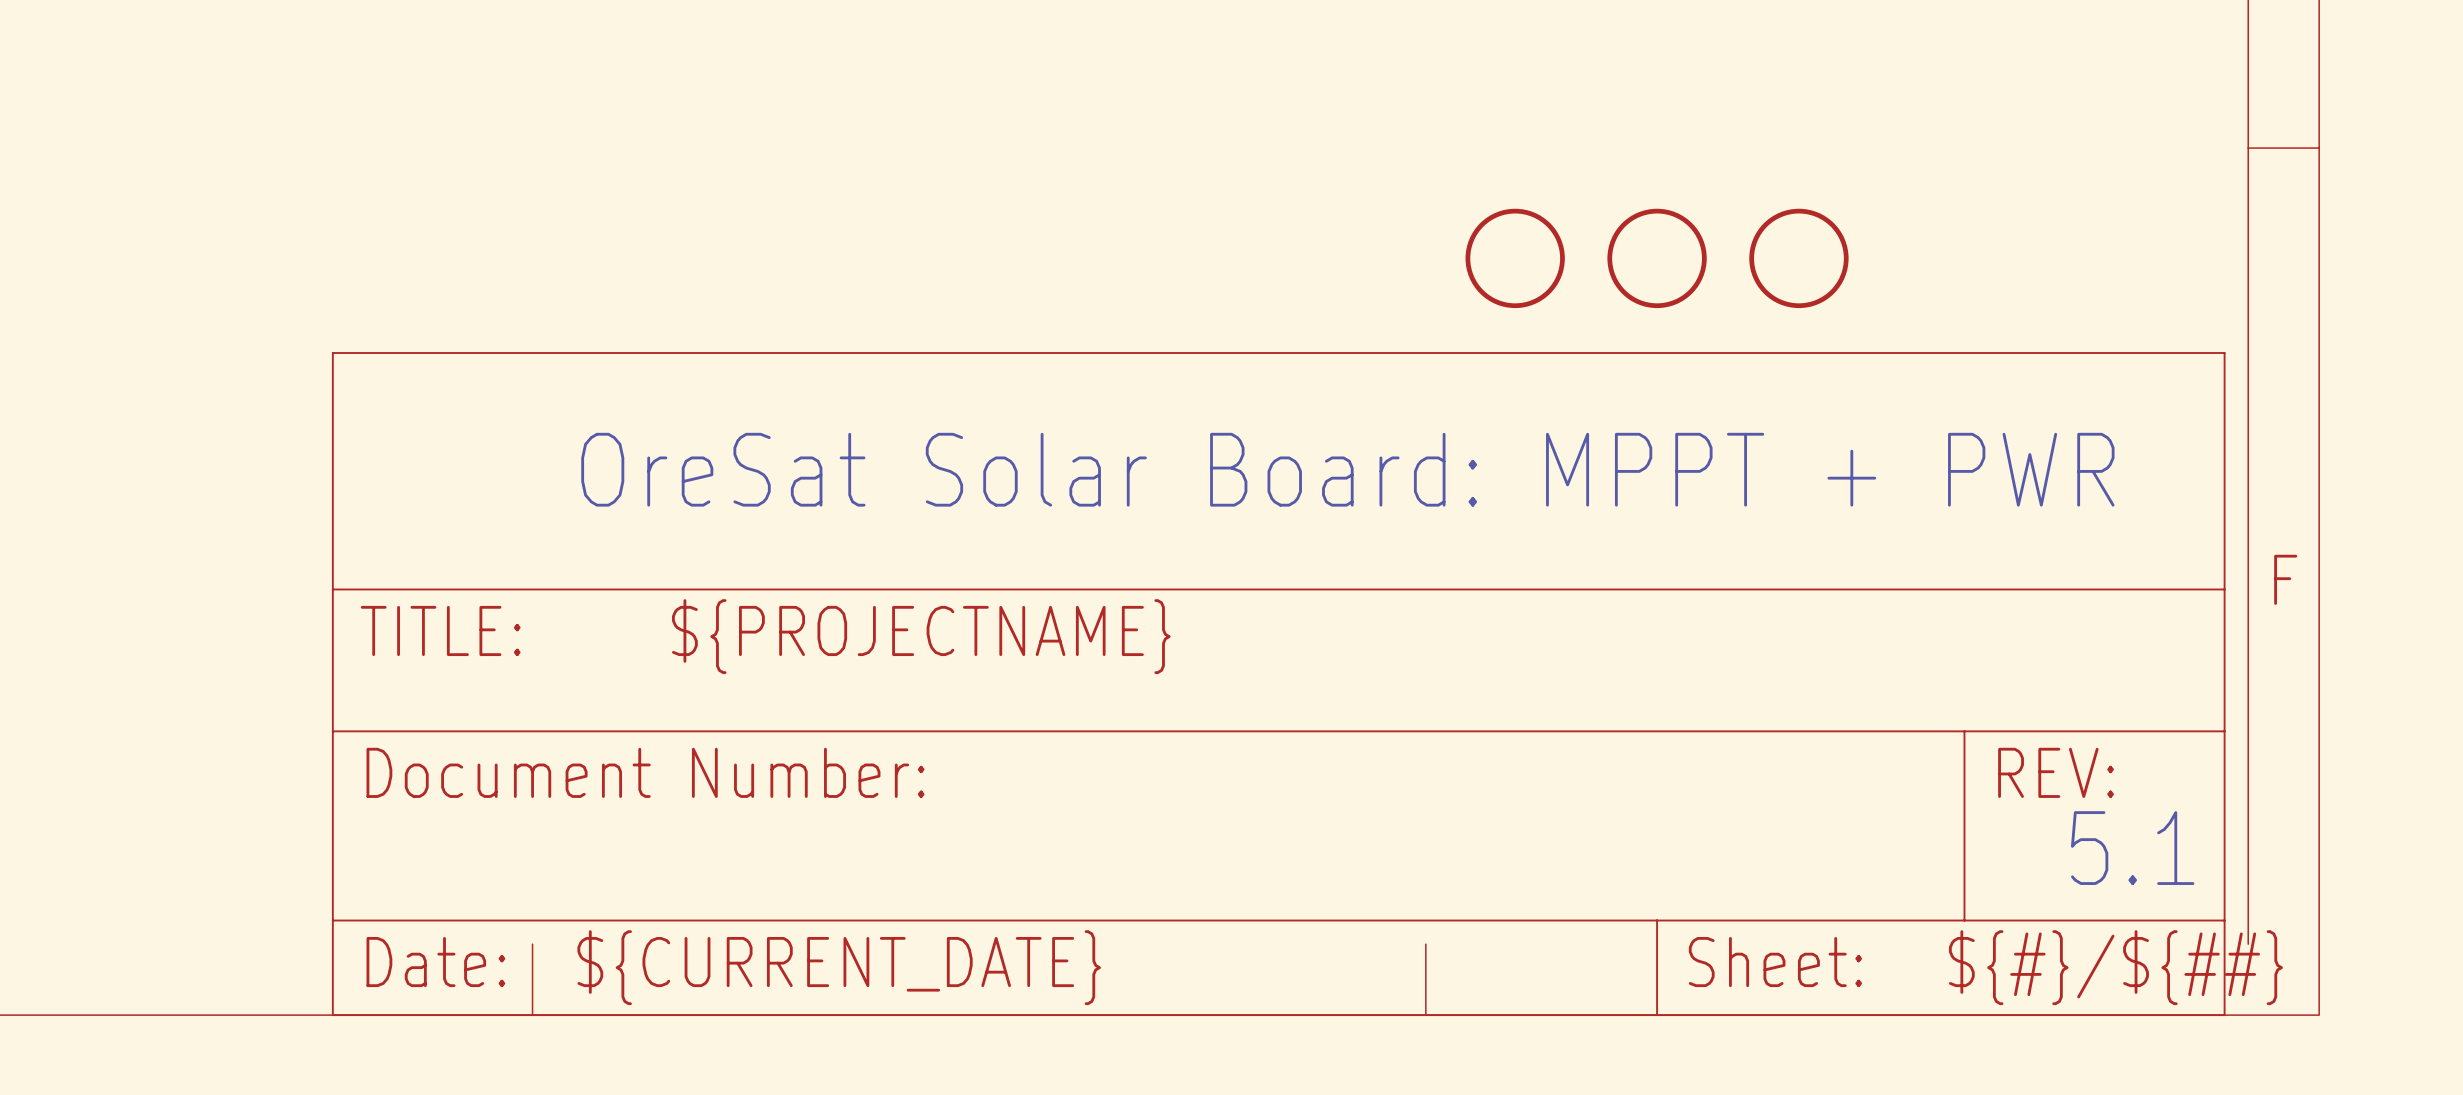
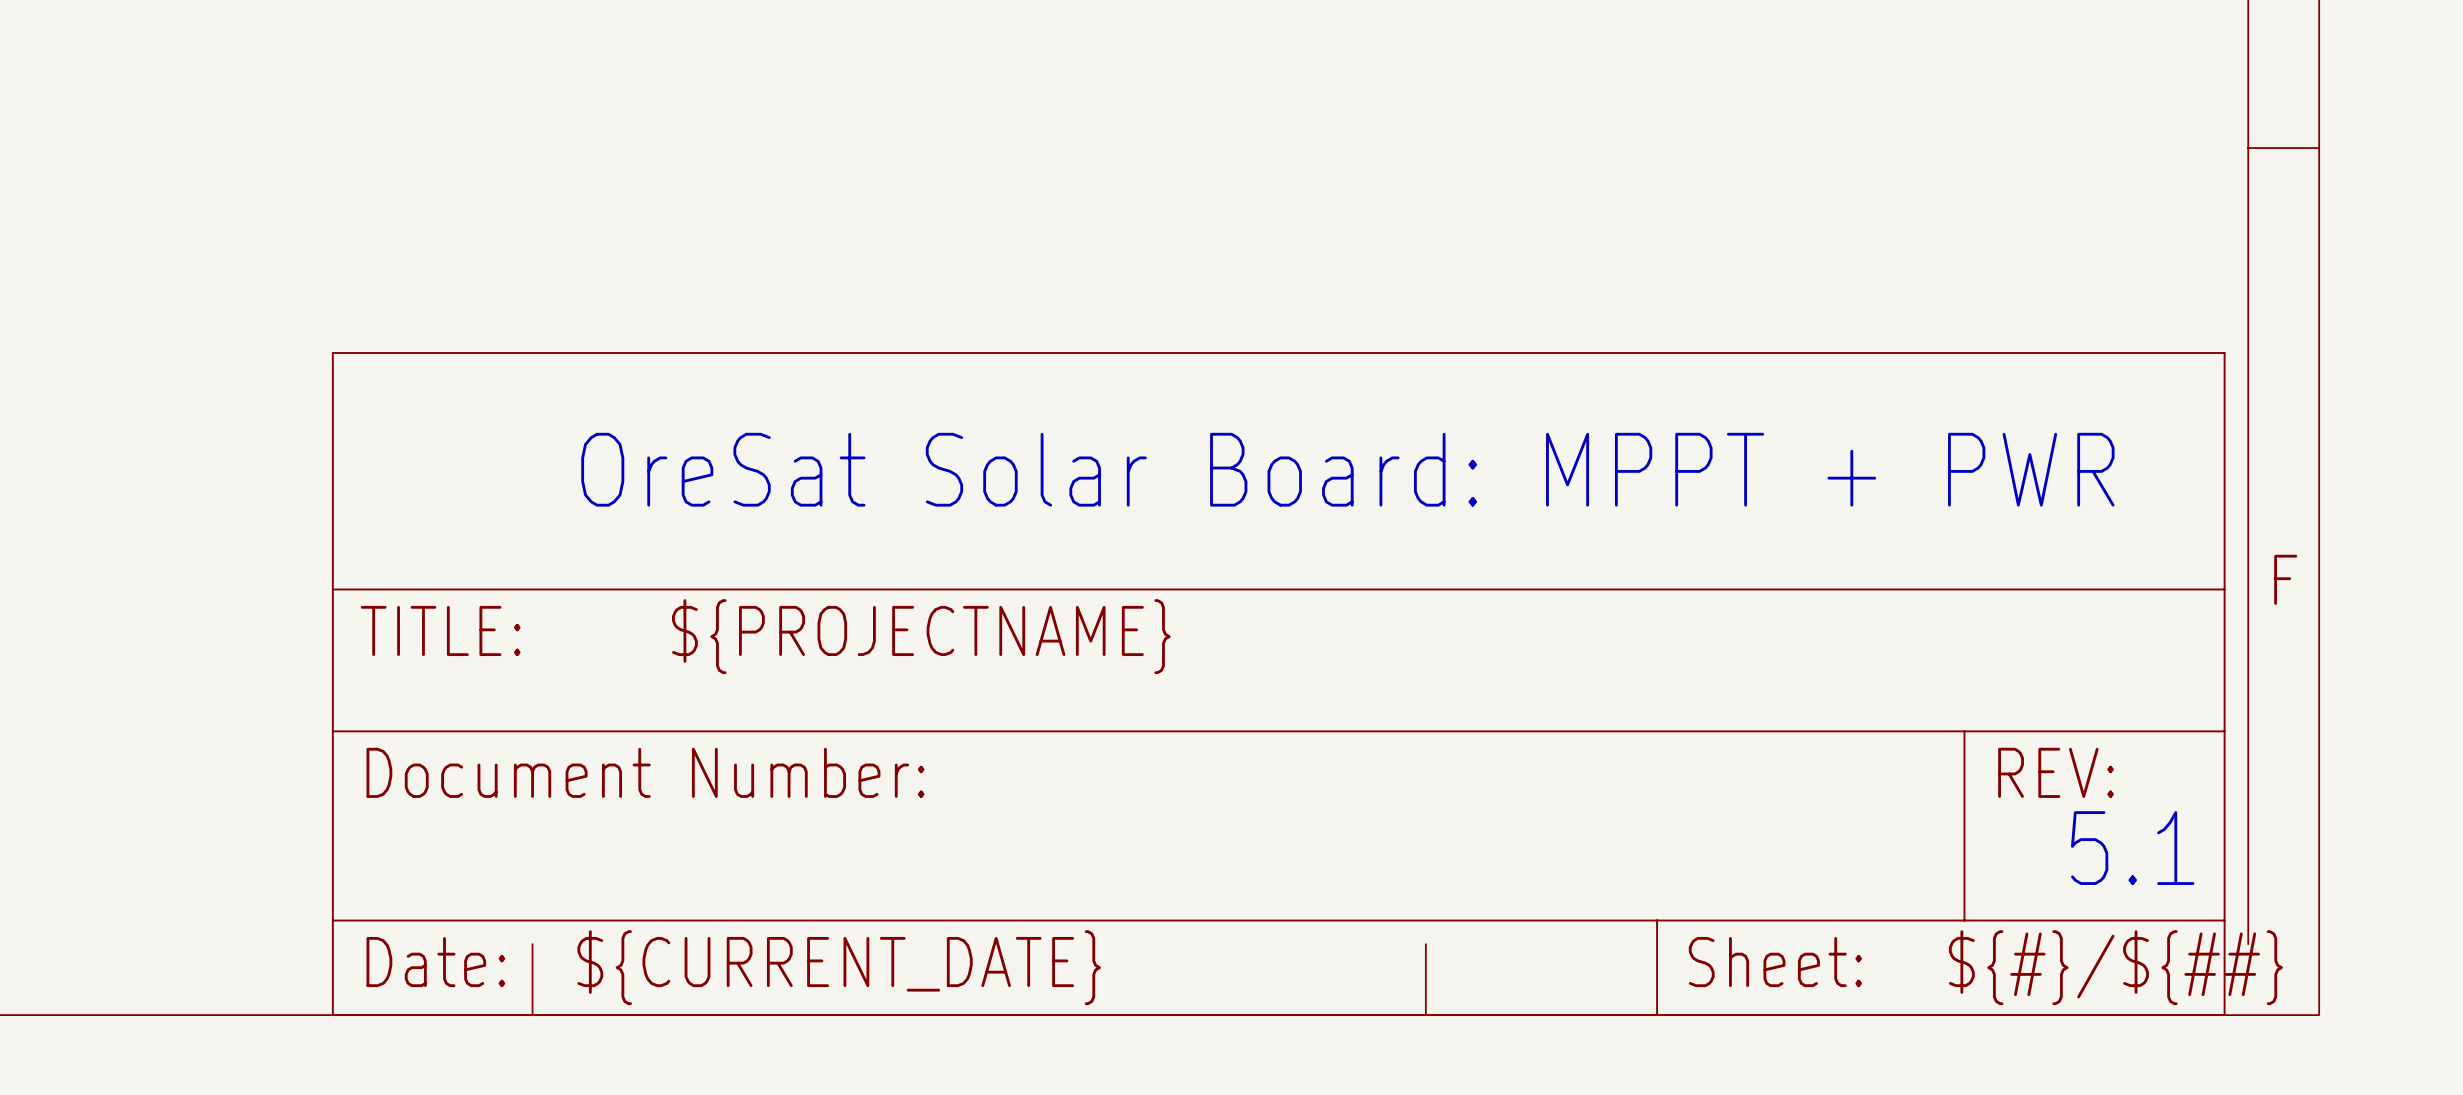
part: (1515, 258) -> none
part: (1657, 258) -> none
part: (1798, 258) -> none

